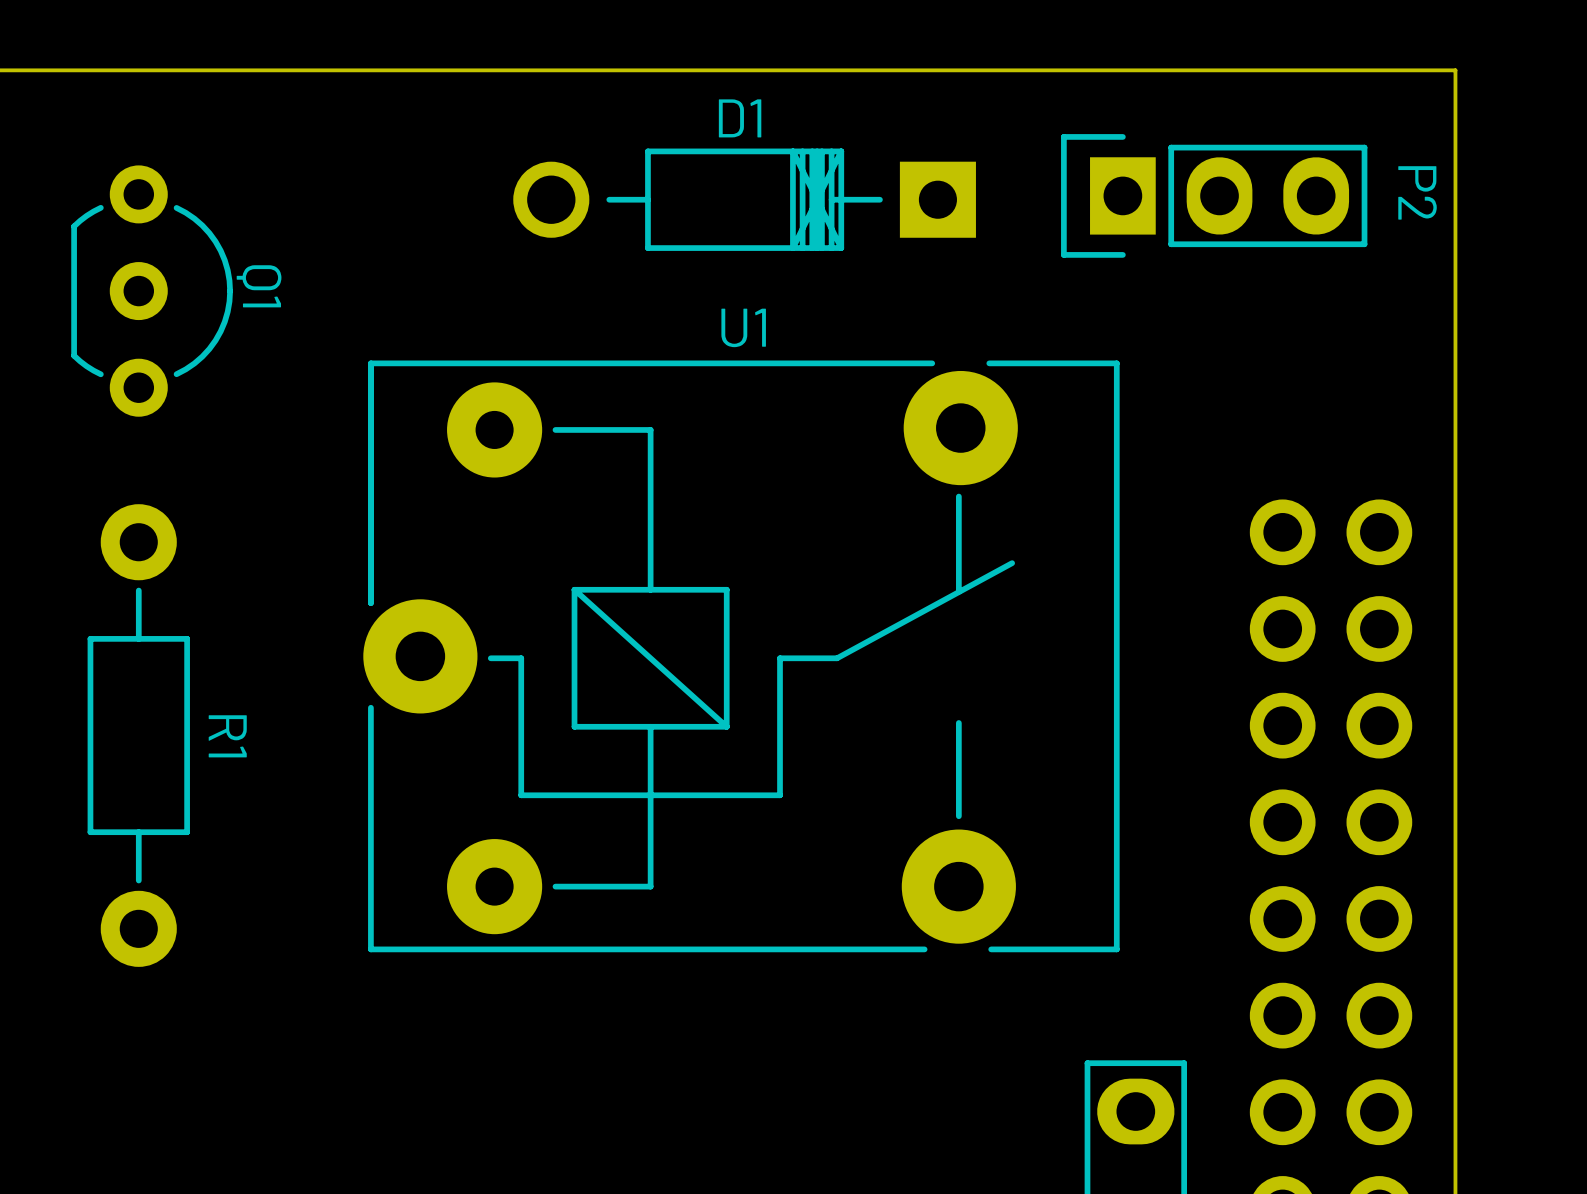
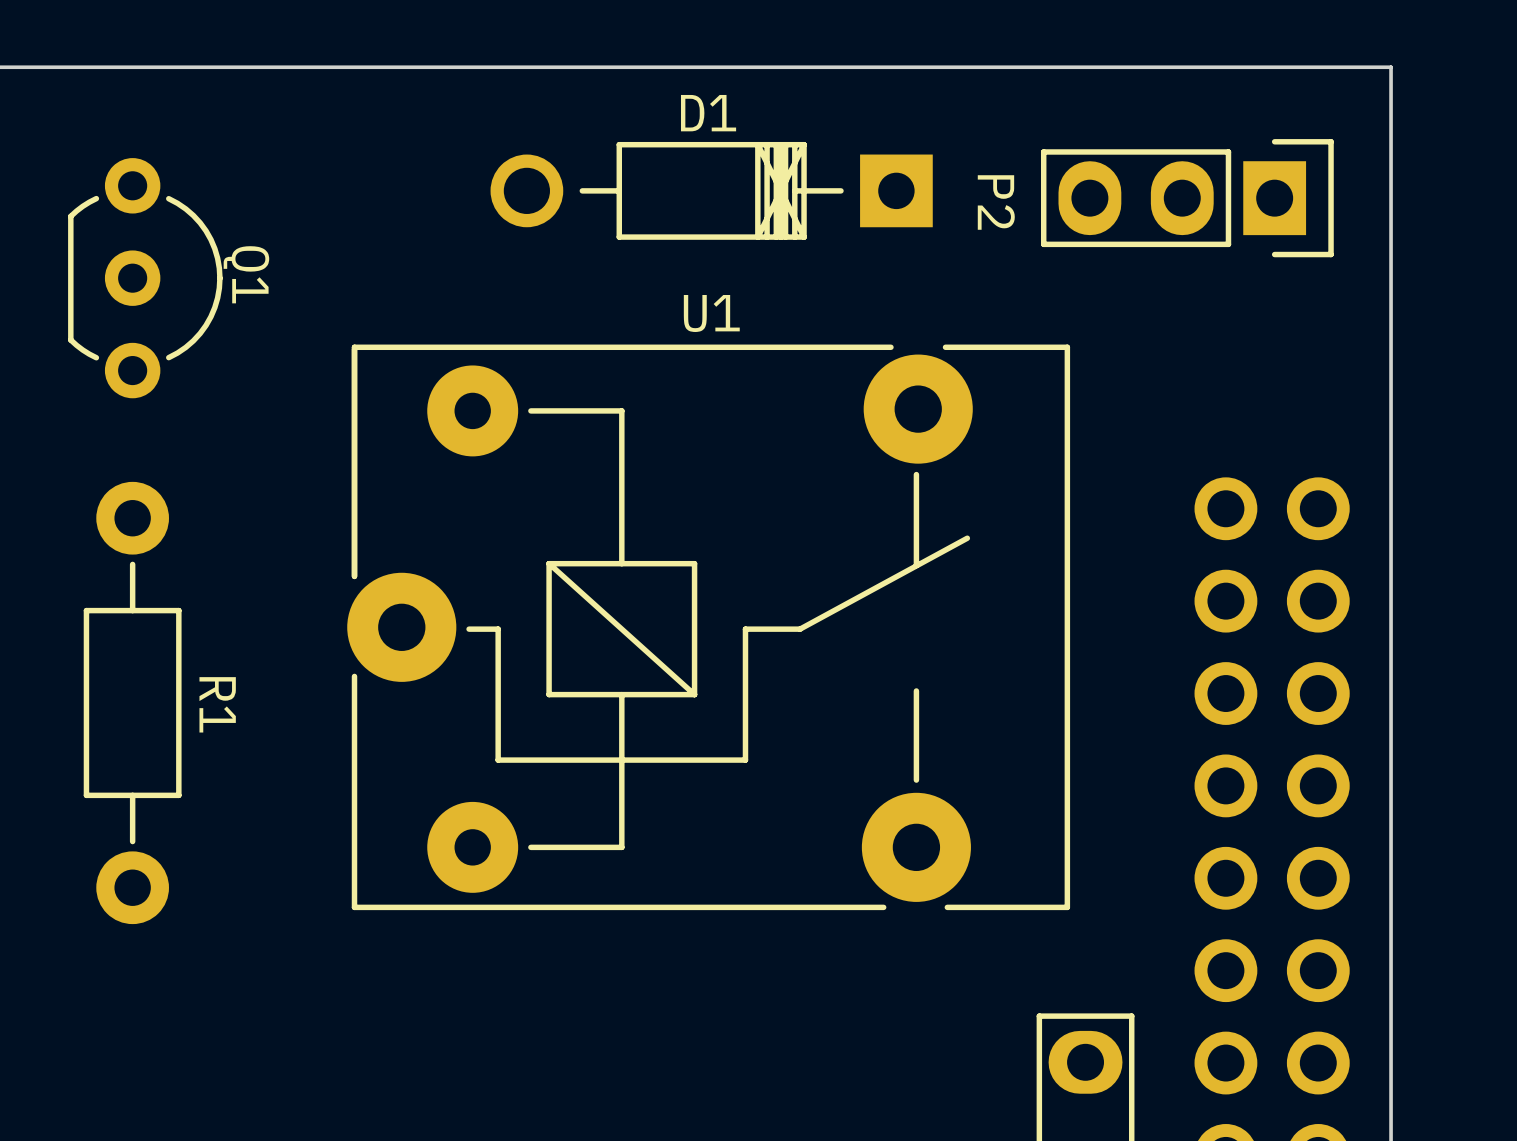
P2 rotation: 0° (1214, 195) -> 180° (1187, 198)

